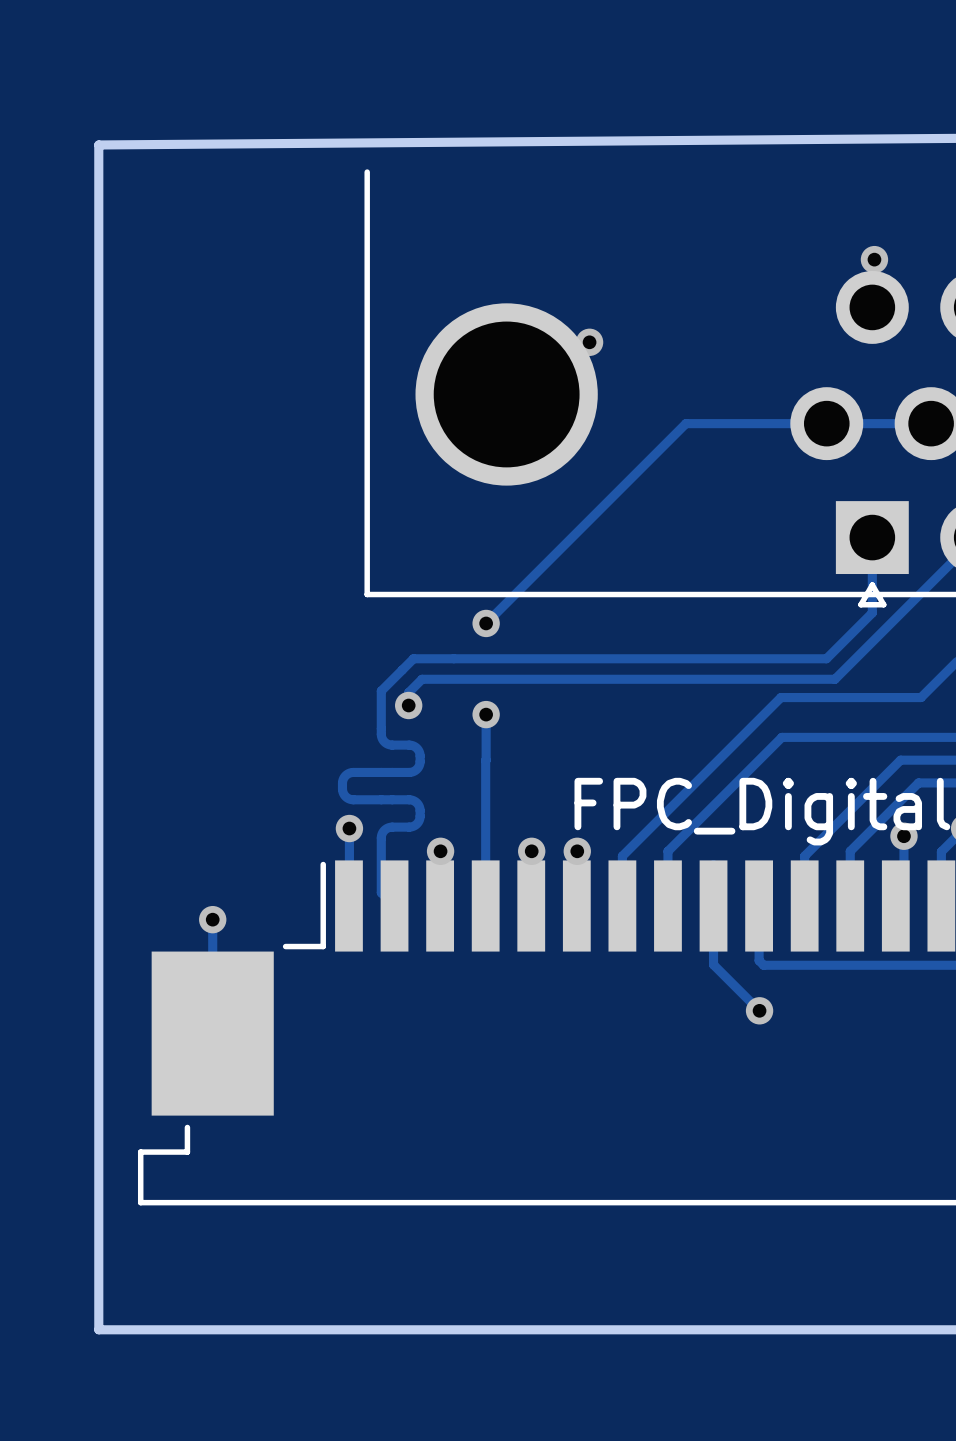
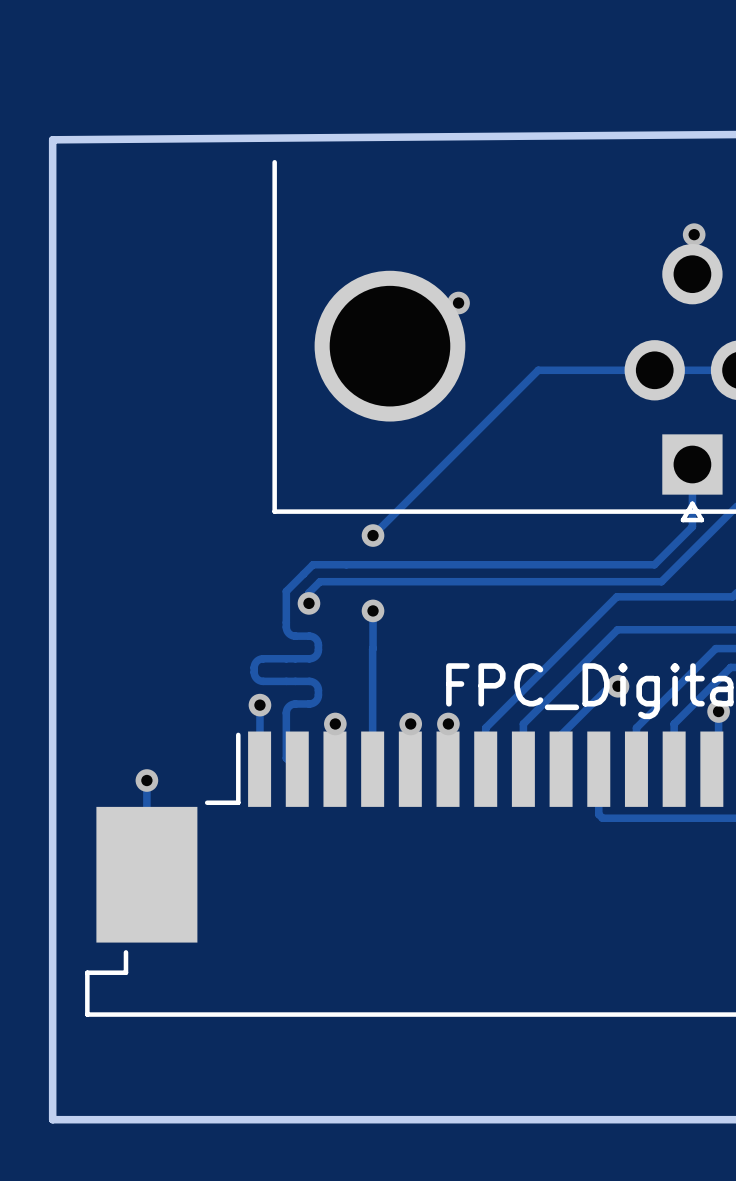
track: none -> (617, 686) (609, 686) (561, 735)
track: (713, 905) (713, 964) (759, 1010) -> none
via position: (759, 1010) -> (617, 686)

